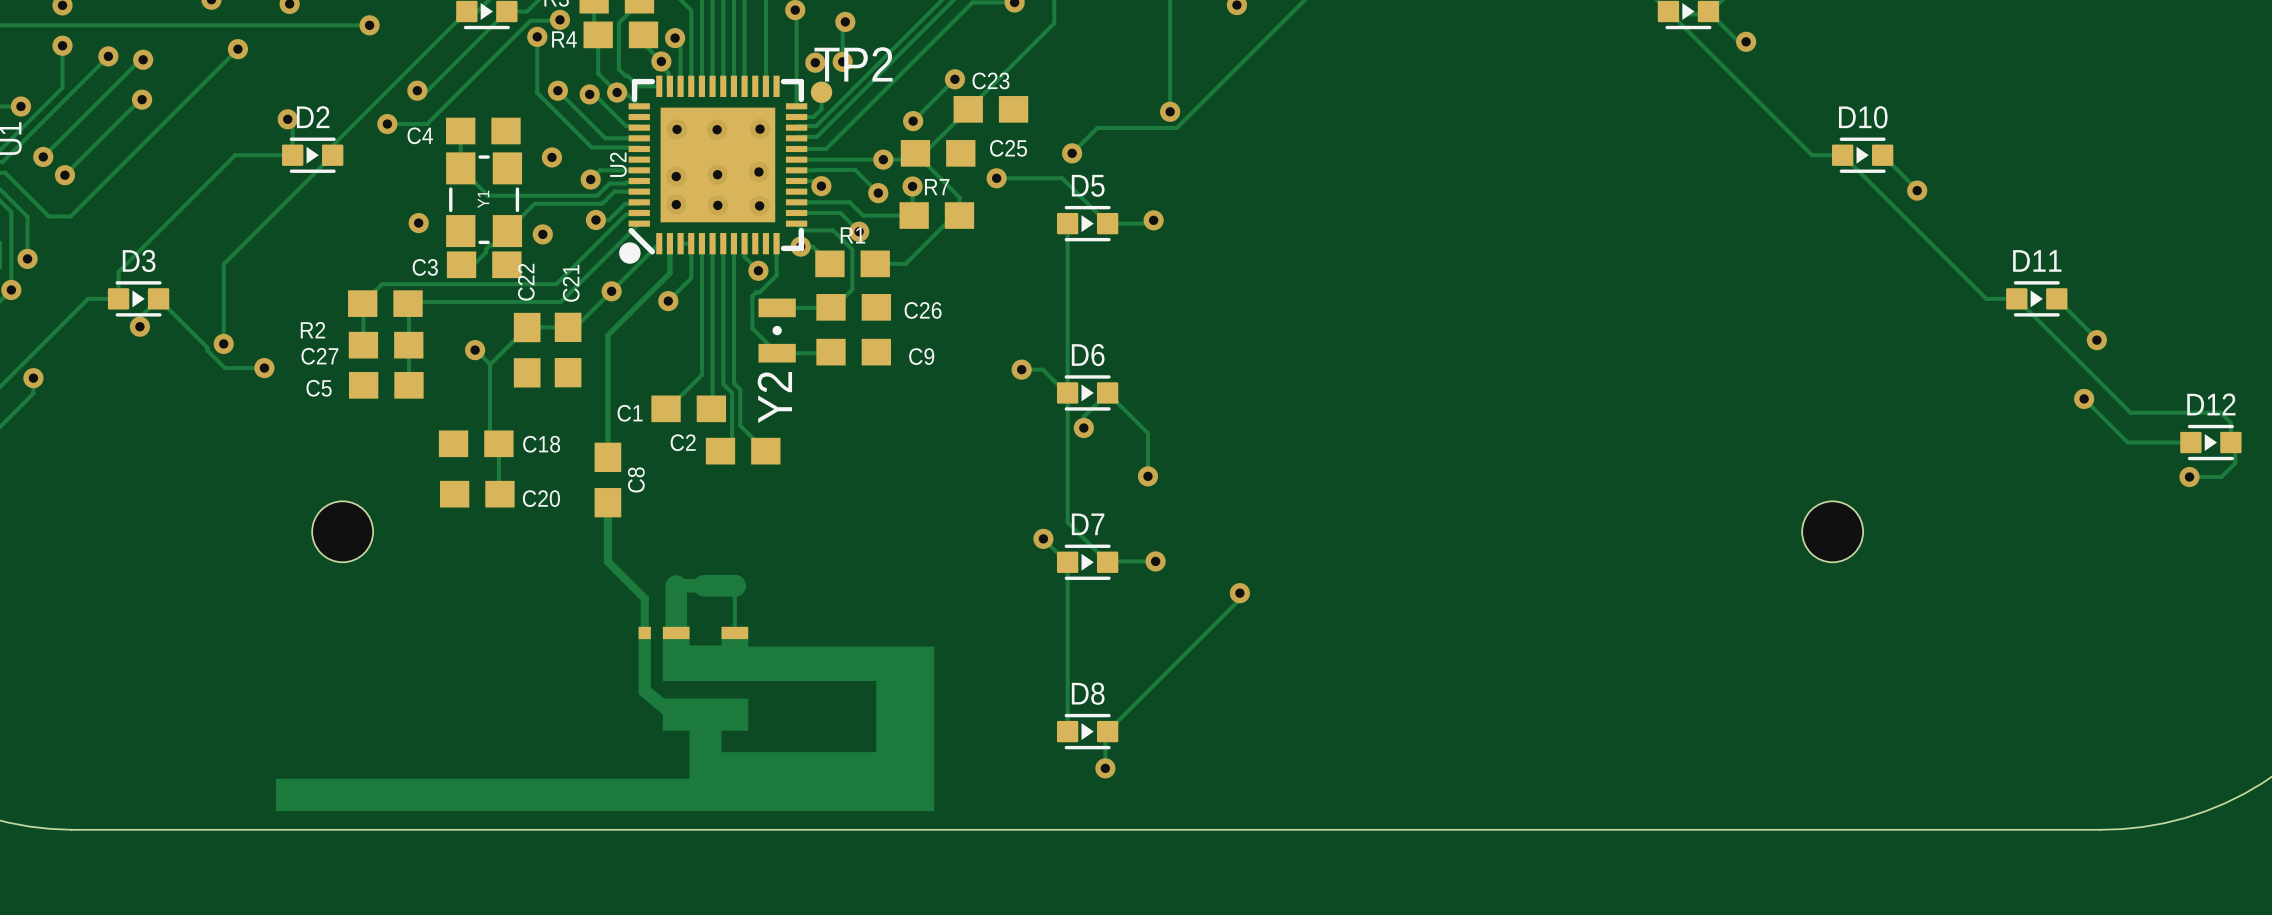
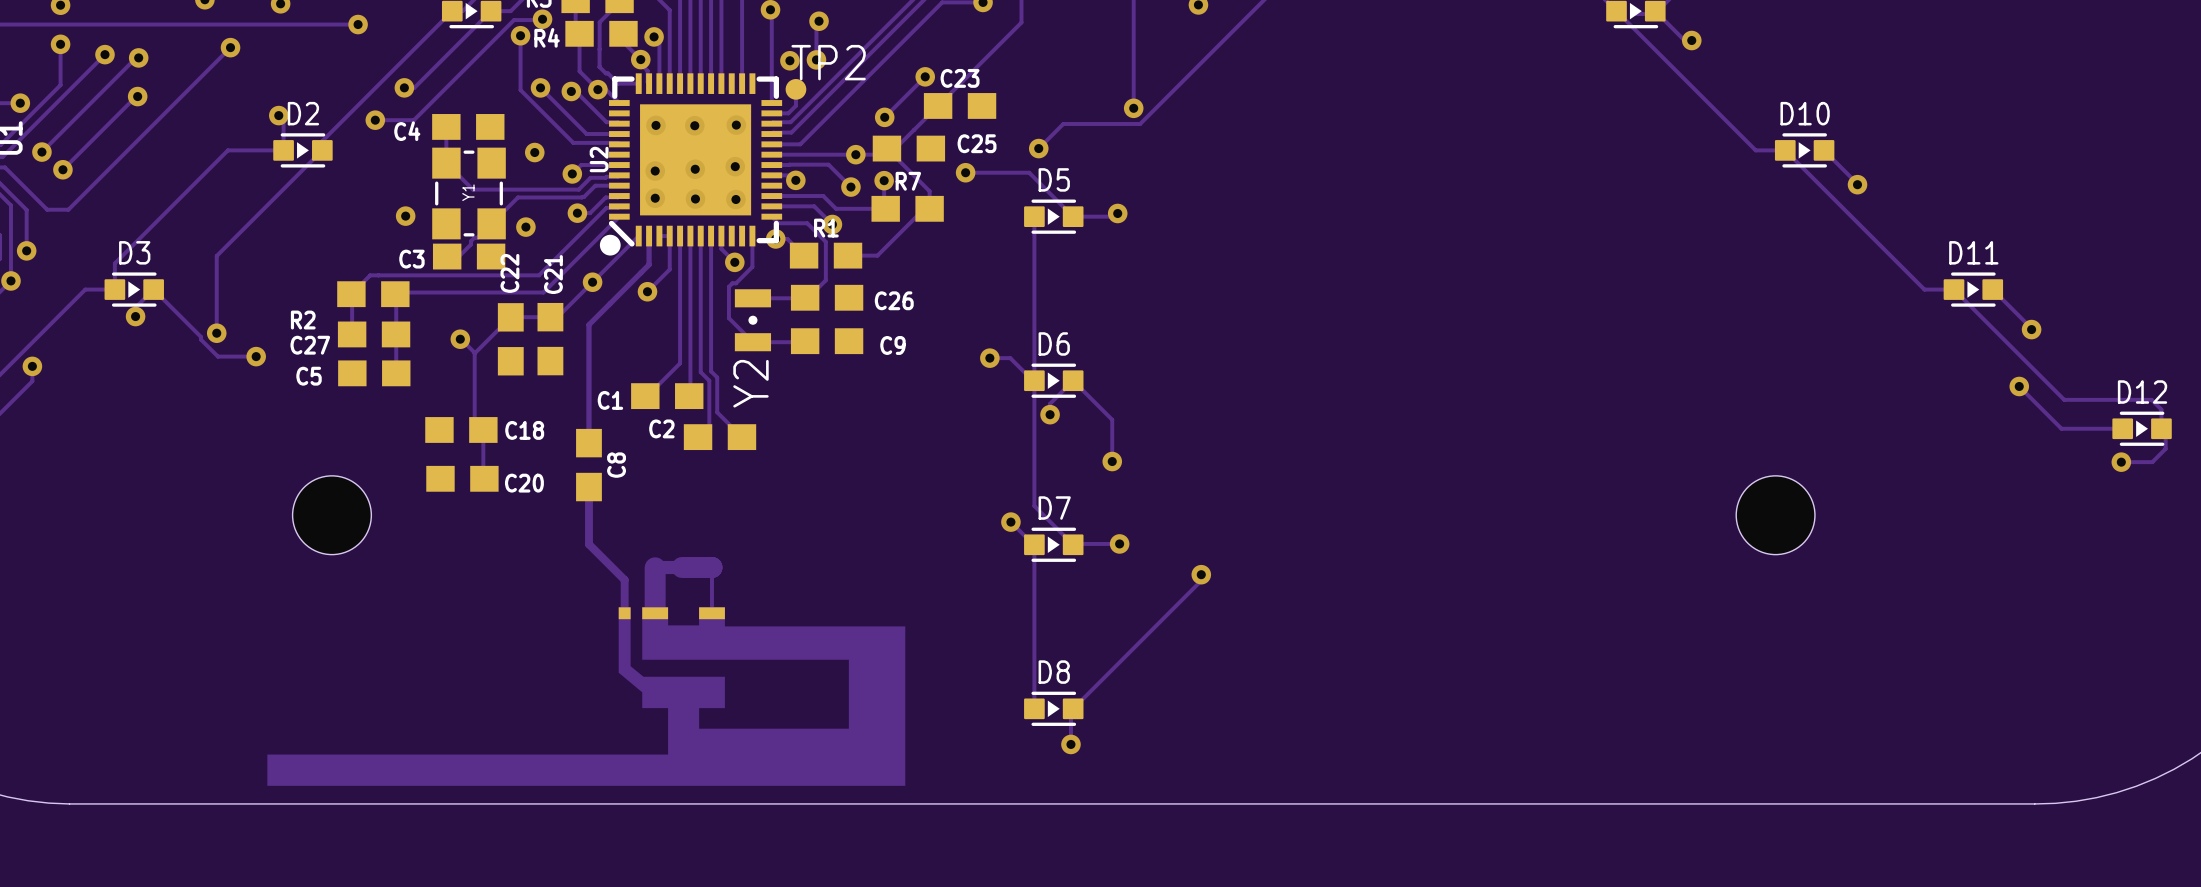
hole size: [312, 501, 374, 563] -> [292, 475, 372, 555]
hole size: [1802, 501, 1864, 563] -> [1736, 475, 1815, 555]

